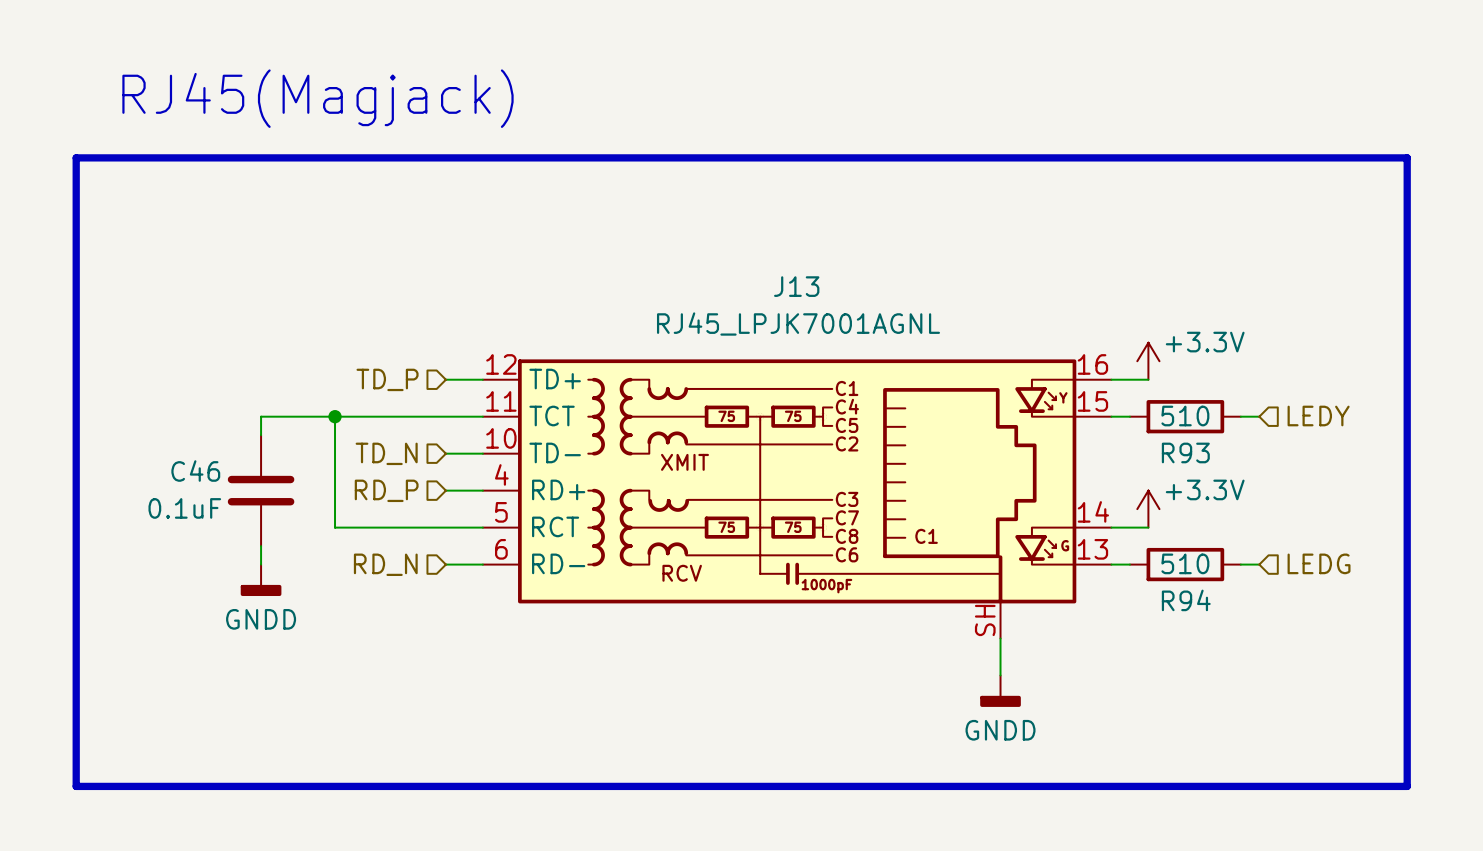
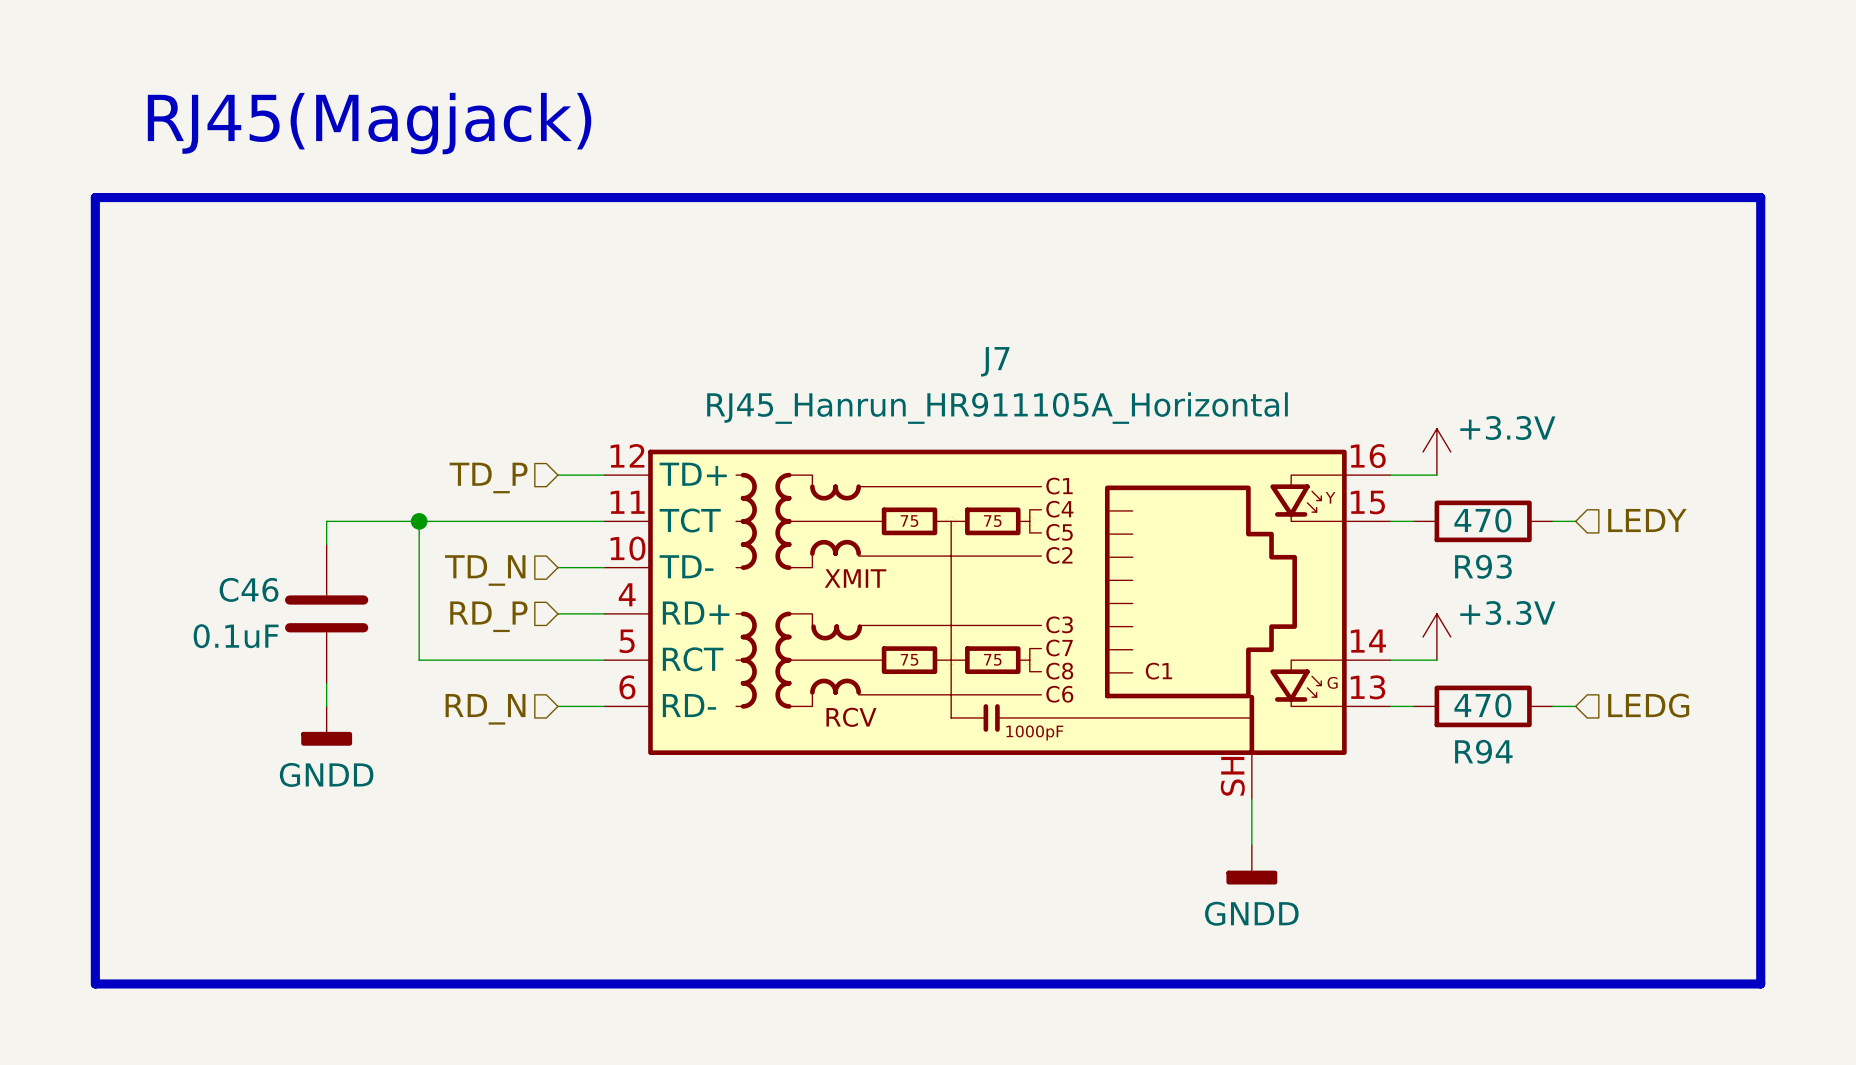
J13 name: J13 (796, 286) -> J7 (995, 361)
J13 value: RJ45_LPJK7001AGNL (798, 324) -> RJ45_Hanrun_HR911105A_Horizontal (997, 408)
R93 value: 510 (1185, 416) -> 470 (1482, 520)
R94 value: 510 (1185, 563) -> 470 (1482, 705)

